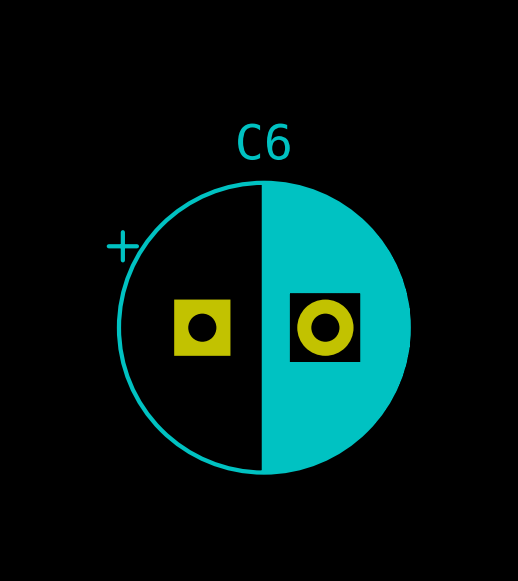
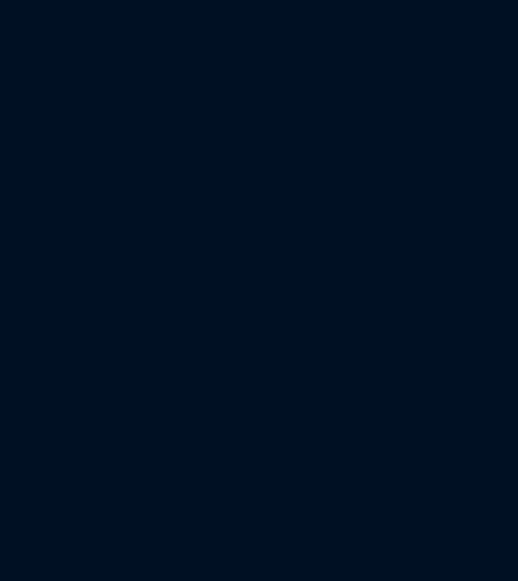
C6: (258, 327) -> none

